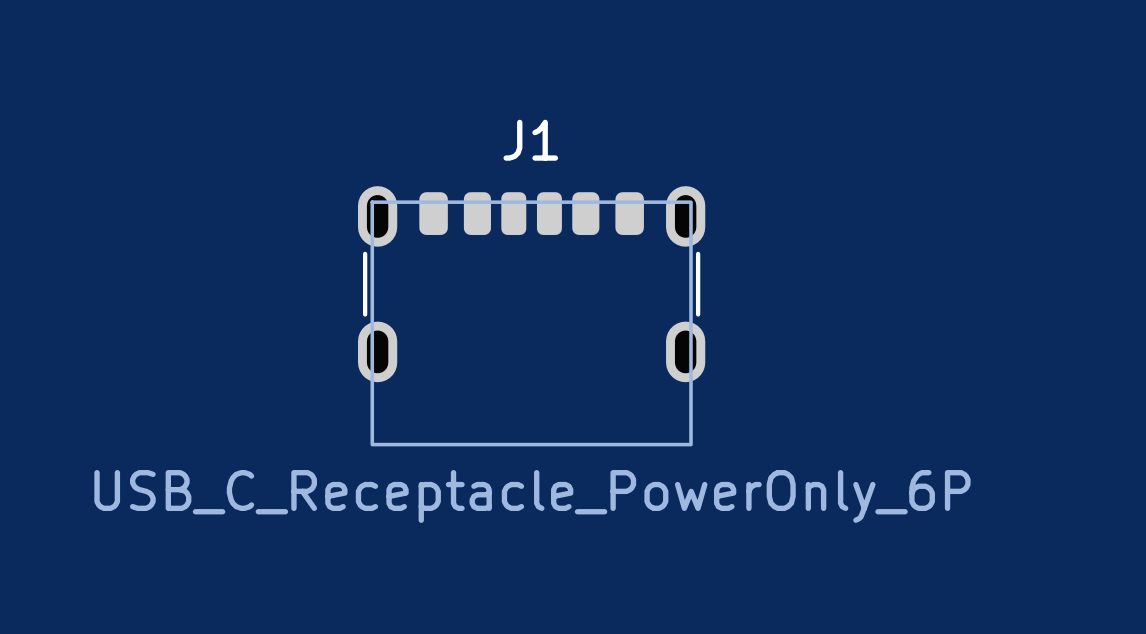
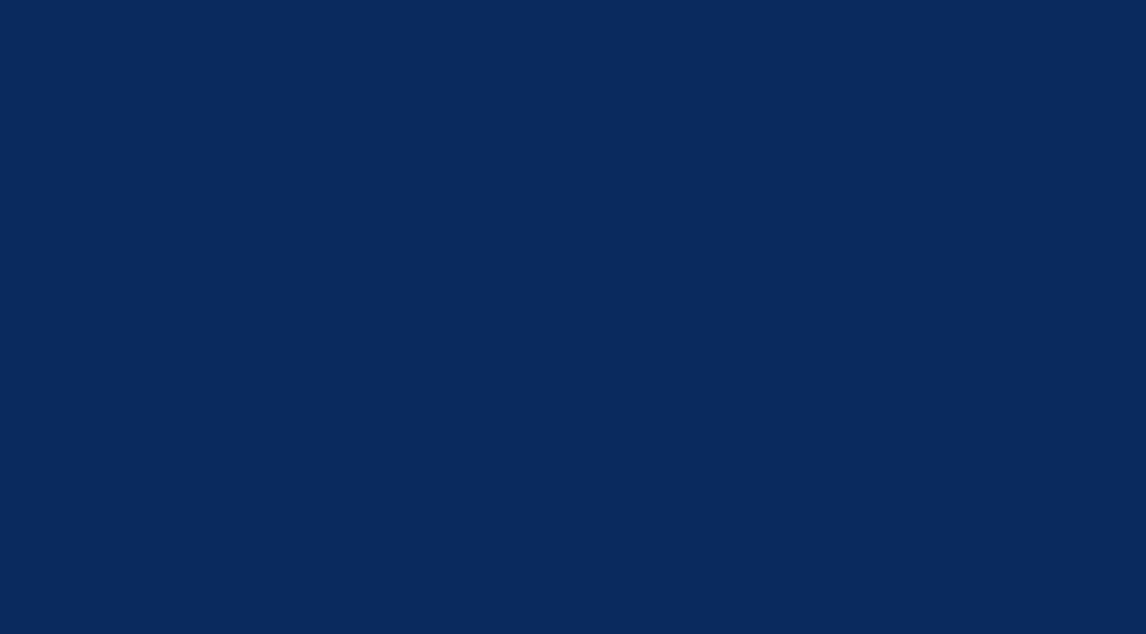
J1: USB_C_Receptacle_PowerOnly_6P (531, 316) -> none

